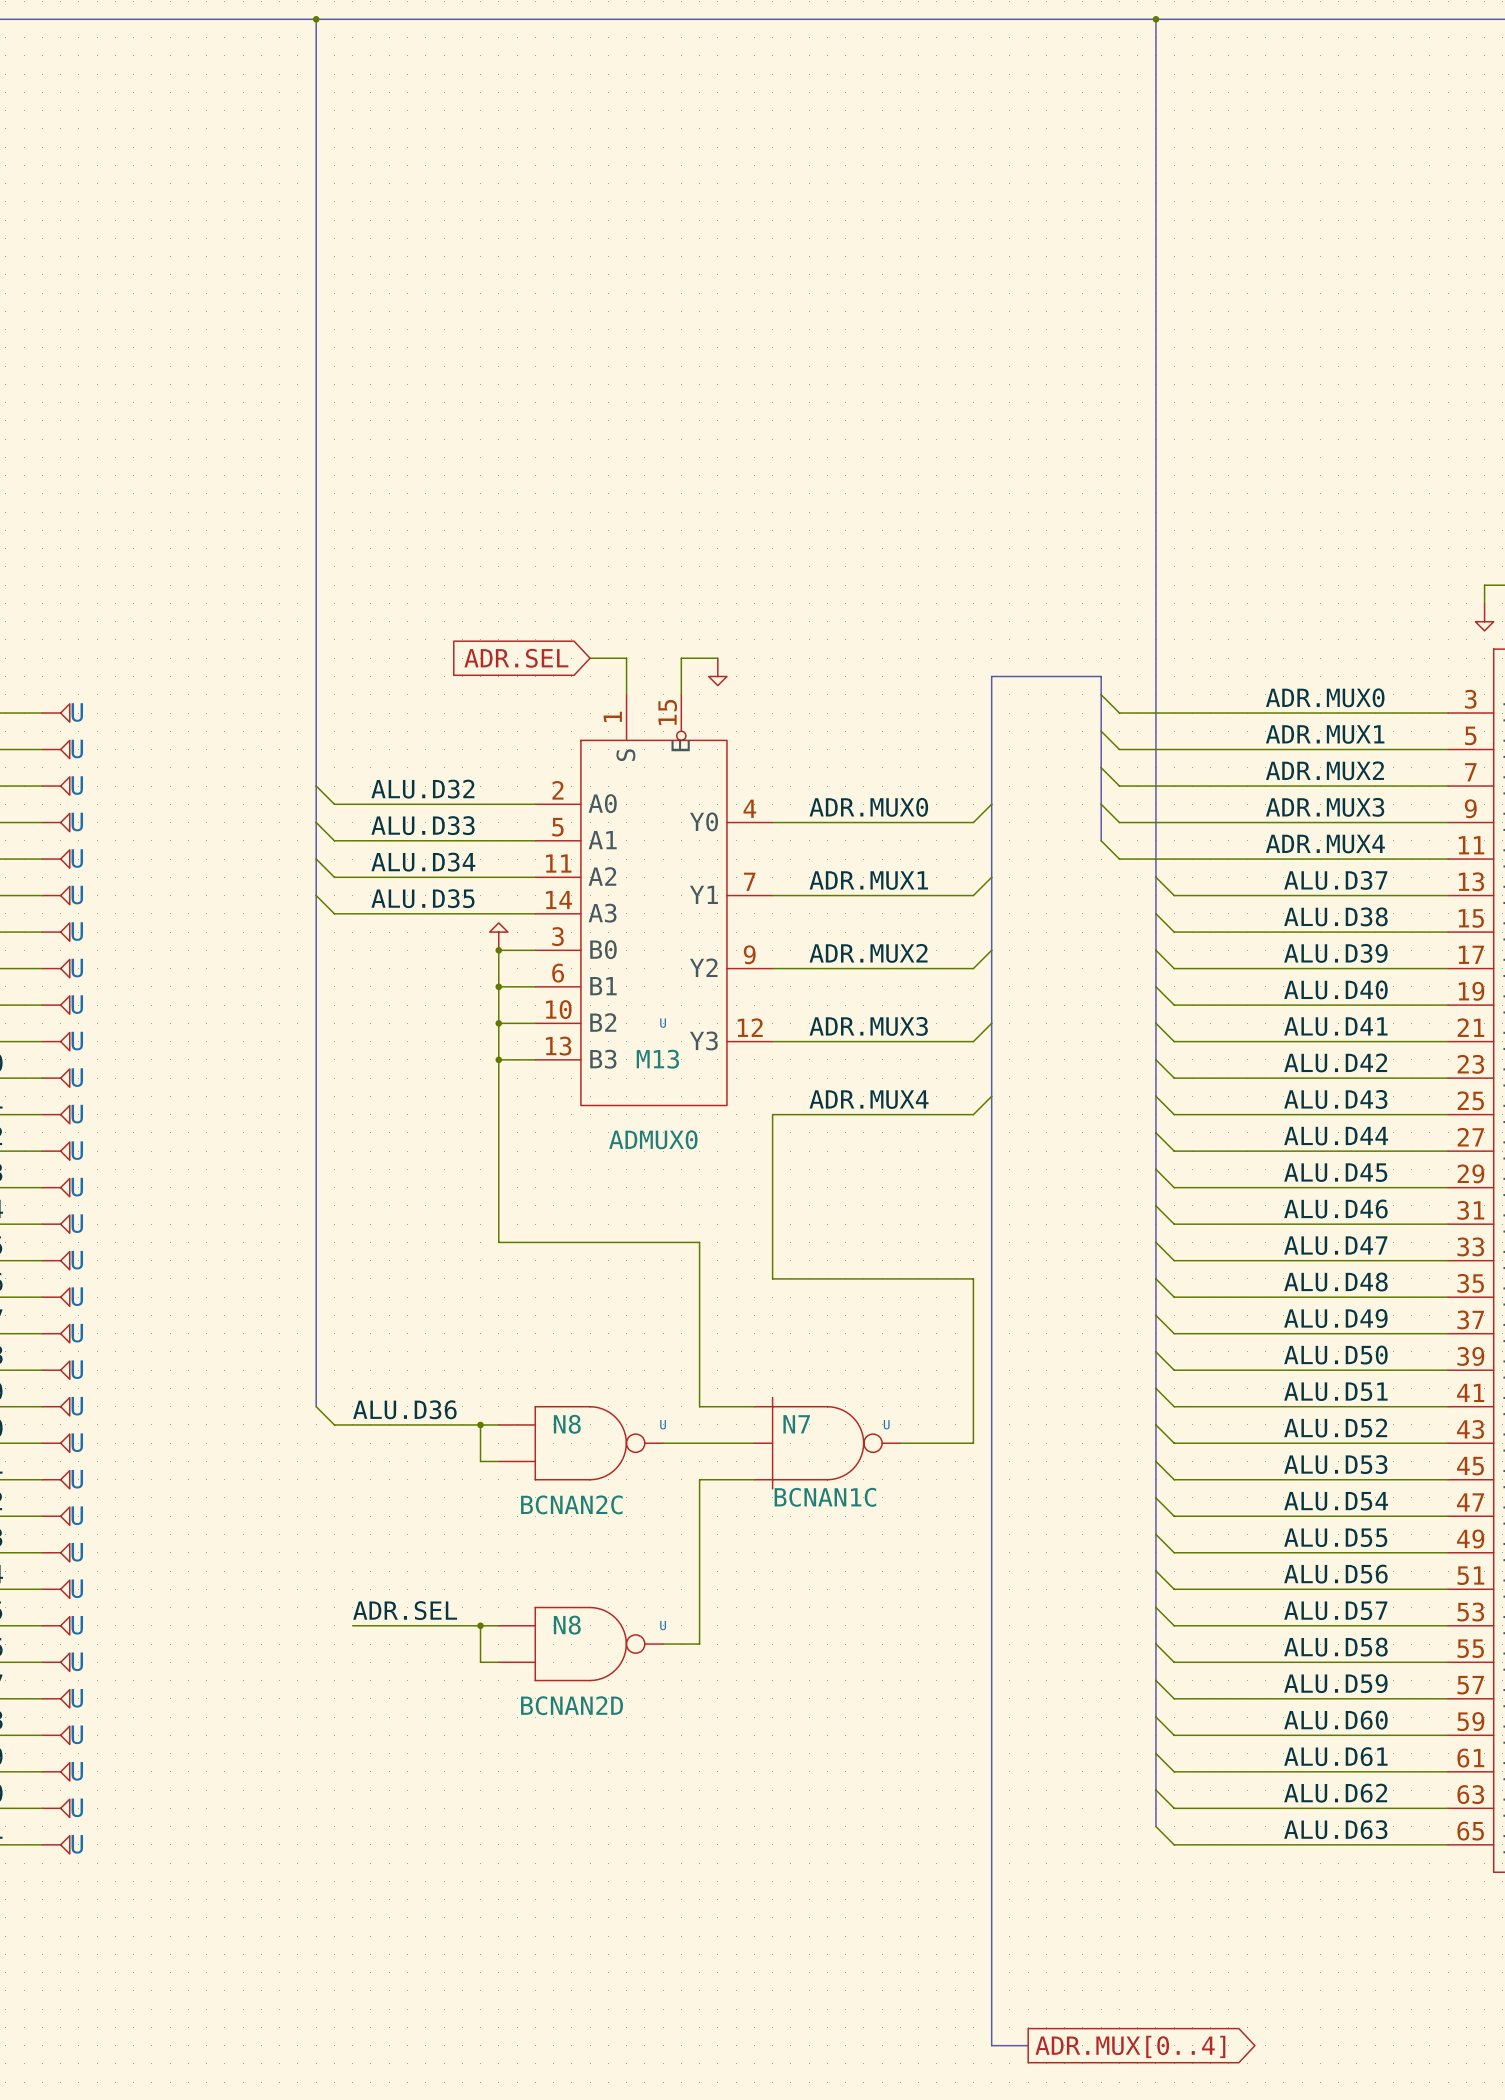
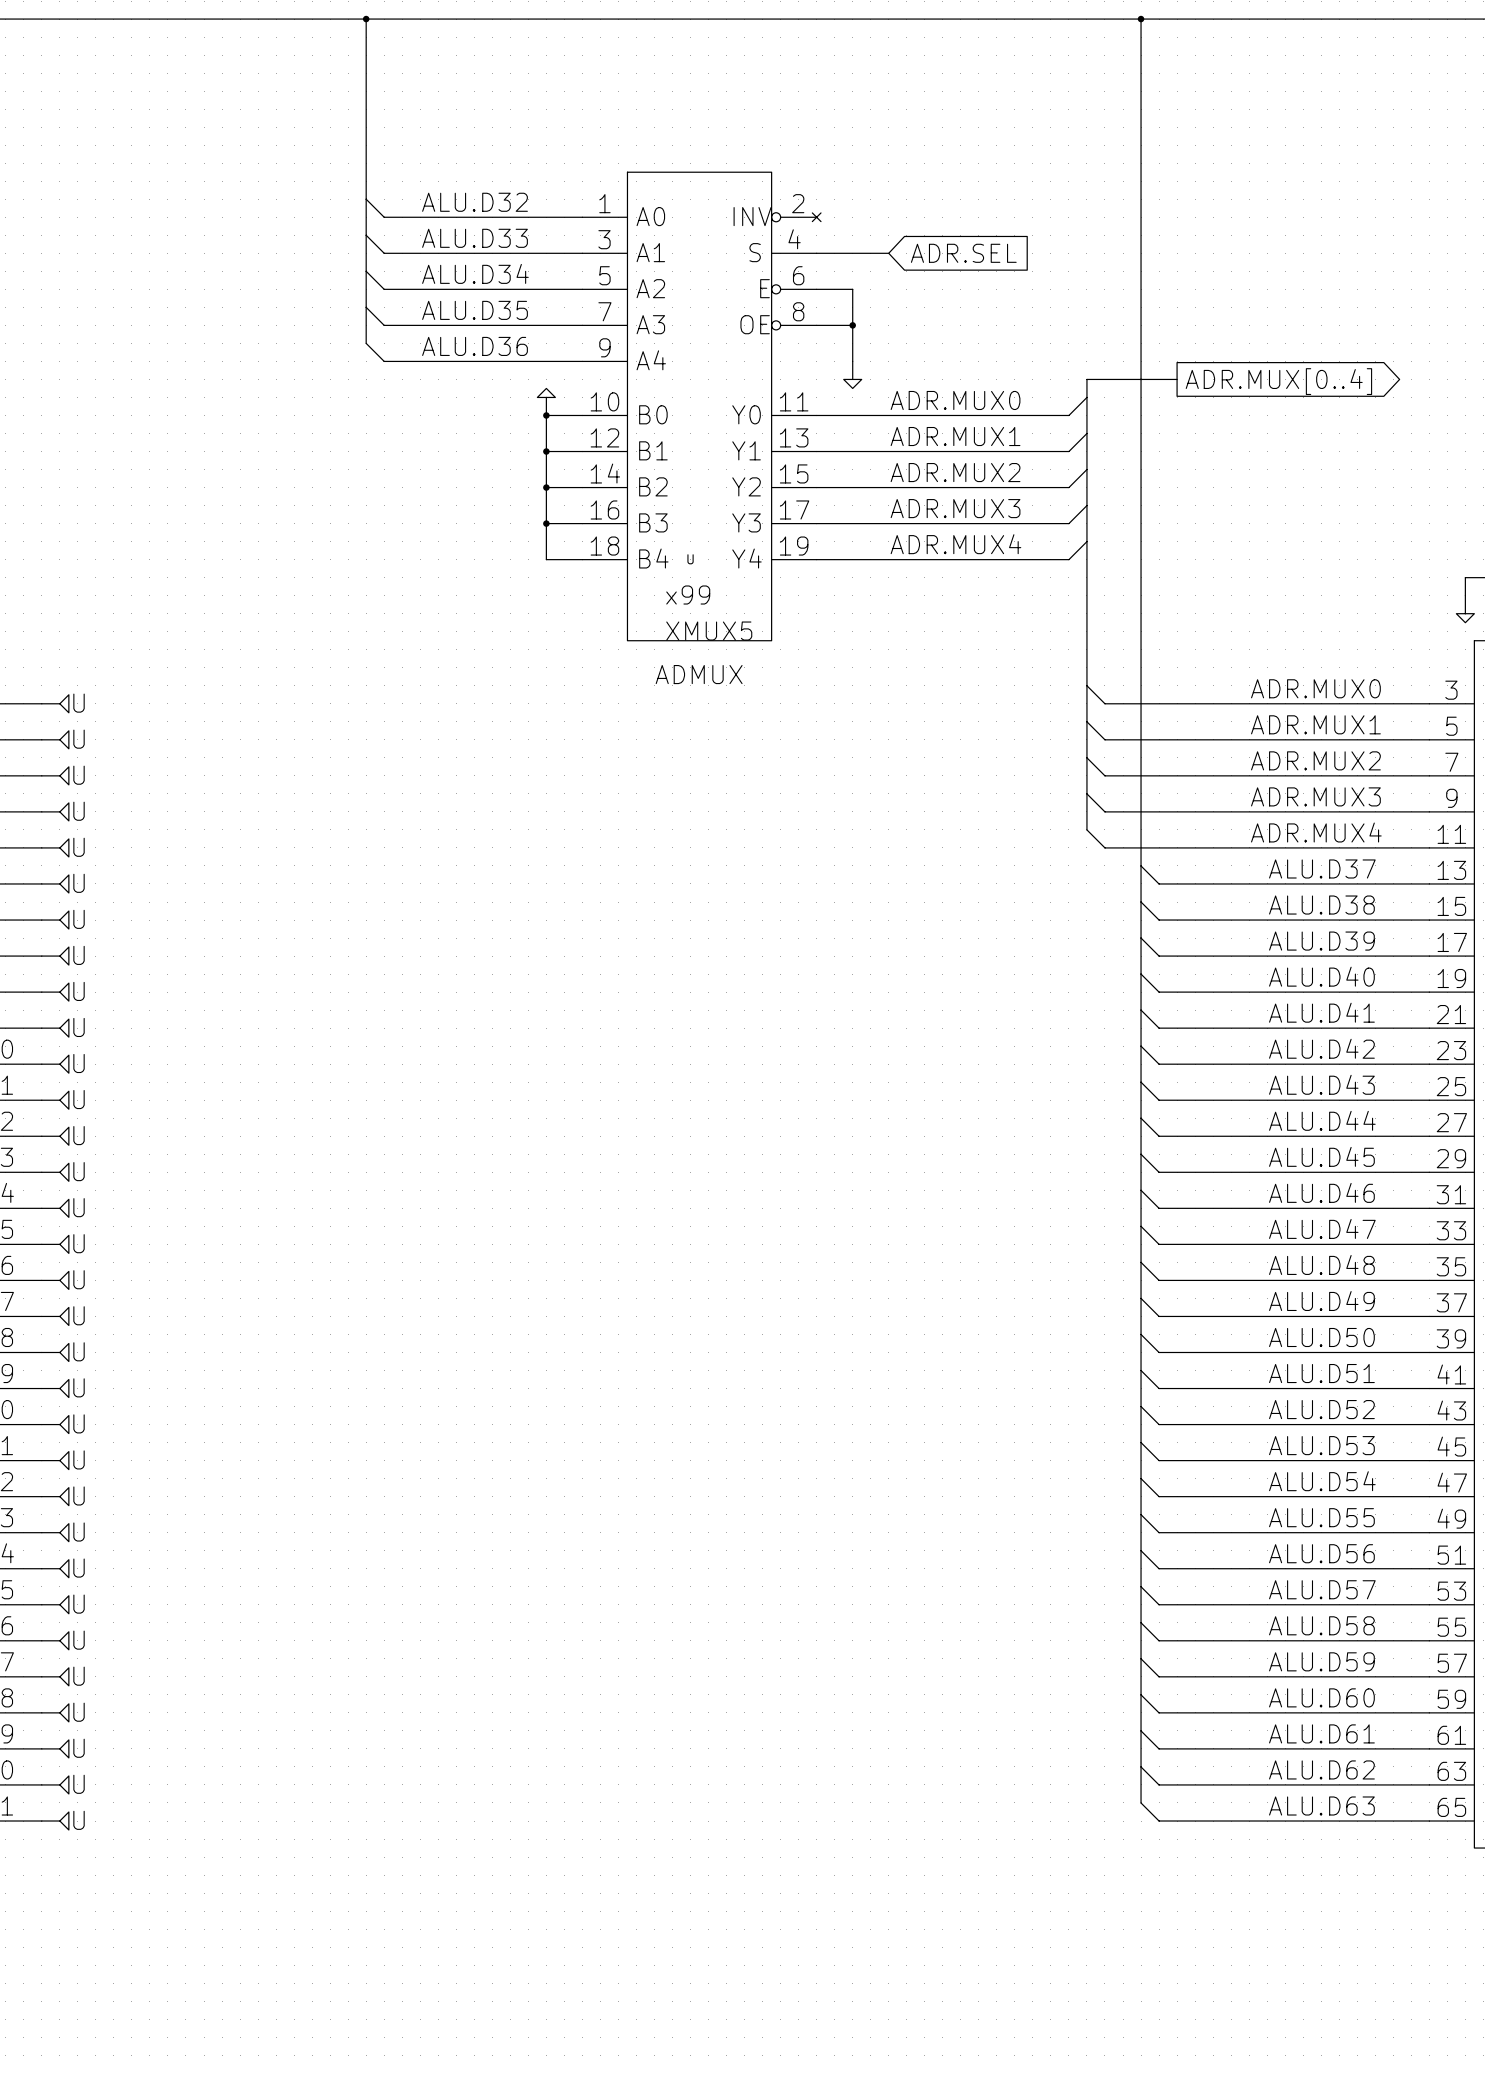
bus: (316, 19) (316, 1406) -> none
junction: (316, 19) -> none
bus: none -> (366, 19) (366, 343)
junction: none -> (366, 19)
wire: none -> (366, 199) (384, 217) (582, 217)
label: none -> ALU.D32 (475, 202)
no-connect mark: none -> (816, 217)
wire: none -> (366, 235) (384, 253) (582, 253)
label: none -> ALU.D33 (475, 238)
wire: none -> (816, 253) (888, 253)
global label: none -> ADR.SEL (963, 253)
wire: none -> (366, 271) (384, 289) (582, 289)
label: none -> ALU.D34 (475, 273)
wire: none -> (816, 289) (852, 289) (852, 361)
wire: none -> (366, 307) (384, 325) (582, 325)
label: none -> ALU.D35 (475, 310)
wire: none -> (816, 325) (852, 325)
junction: none -> (852, 325)
wire: none -> (366, 343) (384, 361) (582, 361)
label: none -> ALU.D36 (475, 346)
power symbol: none -> (852, 375)
global label: none -> ADR.MUX[0..4] (1278, 381)
wire: none -> (1086, 397) (1068, 415) (816, 415)
label: none -> ADR.MUX0 (955, 400)
power symbol: none -> (546, 401)
U: none -> XMUX5 (699, 406)
junction: none -> (546, 415)
wire: none -> (582, 415) (546, 415) (546, 559) (582, 559)
wire: none -> (1086, 433) (1068, 451) (816, 451)
label: none -> ADR.MUX1 (955, 436)
wire: none -> (546, 451) (582, 451)
junction: none -> (546, 451)
wire: none -> (1086, 469) (1068, 487) (816, 487)
label: none -> ADR.MUX2 (955, 472)
wire: none -> (546, 487) (582, 487)
junction: none -> (546, 487)
wire: none -> (1086, 505) (1068, 523) (816, 523)
label: none -> ADR.MUX3 (955, 508)
wire: none -> (546, 523) (582, 523)
junction: none -> (546, 523)
wire: none -> (1086, 541) (1068, 559) (816, 559)
label: none -> ADR.MUX4 (955, 544)
global label: ADR.SEL (516, 658) -> none
wire: (590, 658) (626, 658) (626, 694) -> none
wire: (717, 658) (681, 658) (681, 694) -> none
power symbol: (717, 672) -> none
bus: (1101, 676) (991, 676) (991, 2045) (1028, 2045) -> (1086, 667) (1086, 379) (1177, 379)
wire: (316, 786) (334, 804) (535, 804) -> none
label: ALU.D32 (422, 789) -> none
wire: (991, 804) (973, 822) (772, 822) -> none
label: ADR.MUX0 (868, 807) -> none
wire: (316, 822) (334, 840) (535, 840) -> none
label: ALU.D33 (423, 825) -> none
wire: (316, 859) (334, 877) (535, 877) -> none
label: ALU.D34 (423, 862) -> none
wire: (991, 877) (973, 895) (772, 895) -> none
label: ADR.MUX1 (868, 880) -> none
wire: (316, 895) (334, 913) (535, 913) -> none
label: ALU.D35 (422, 898) -> none
U: (653, 900) -> none
power symbol: (498, 936) -> none
junction: (498, 950) -> none
wire: (535, 950) (498, 950) (498, 1242) (699, 1242) (699, 1406) (754, 1406) -> none
wire: (991, 950) (973, 968) (772, 968) -> none
label: ADR.MUX2 (868, 953) -> none
wire: (498, 986) (535, 986) -> none
junction: (498, 986) -> none
wire: (498, 1023) (535, 1023) -> none
junction: (498, 1023) -> none
wire: (991, 1023) (973, 1041) (772, 1041) -> none
label: ADR.MUX3 (868, 1026) -> none
wire: (498, 1059) (535, 1059) -> none
junction: (498, 1059) -> none
wire: (991, 1096) (973, 1114) (772, 1114) (772, 1278) (973, 1278) (973, 1443) (900, 1443) -> none
label: ADR.MUX4 (869, 1099) -> none
wire: (316, 1406) (334, 1424) (498, 1424) -> none
label: ALU.D36 (404, 1409) -> none
wire: (480, 1424) (480, 1461) (498, 1461) -> none
junction: (480, 1424) -> none
U: (580, 1443) -> none
wire: (663, 1443) (754, 1443) -> none
U: (827, 1443) -> none
wire: (754, 1479) (699, 1479) (699, 1644) (663, 1644) -> none
label: ADR.SEL (405, 1610) -> none
wire: (352, 1625) (498, 1625) -> none
wire: (480, 1625) (480, 1662) (498, 1662) -> none
junction: (480, 1625) -> none
U: (580, 1644) -> none
global label: ADR.MUX[0..4] (1130, 2046) -> none

